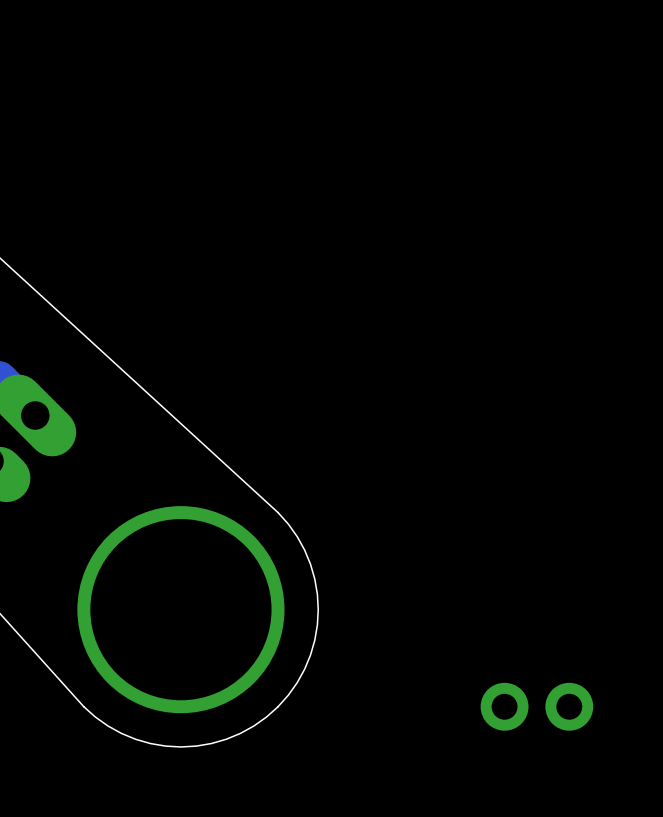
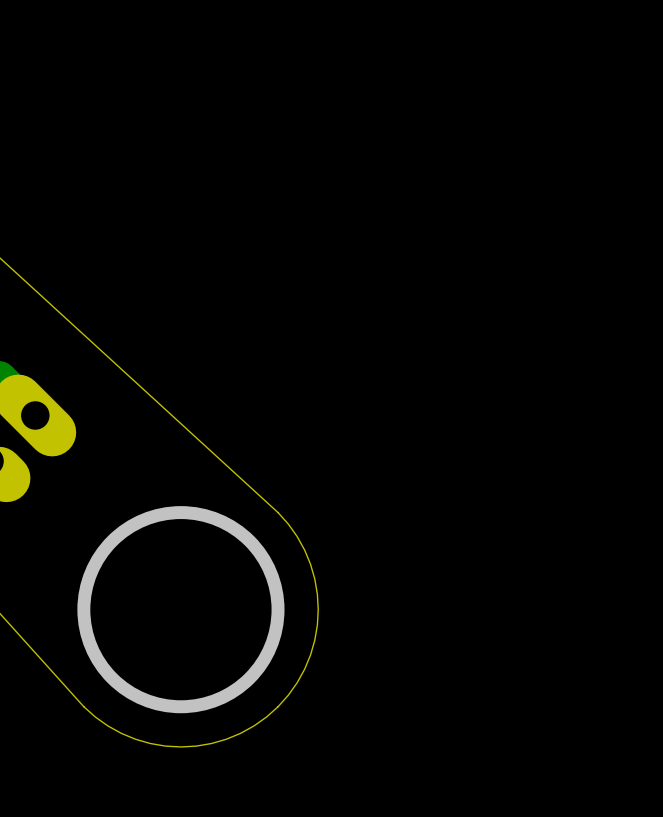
part: (536, 706) -> none

